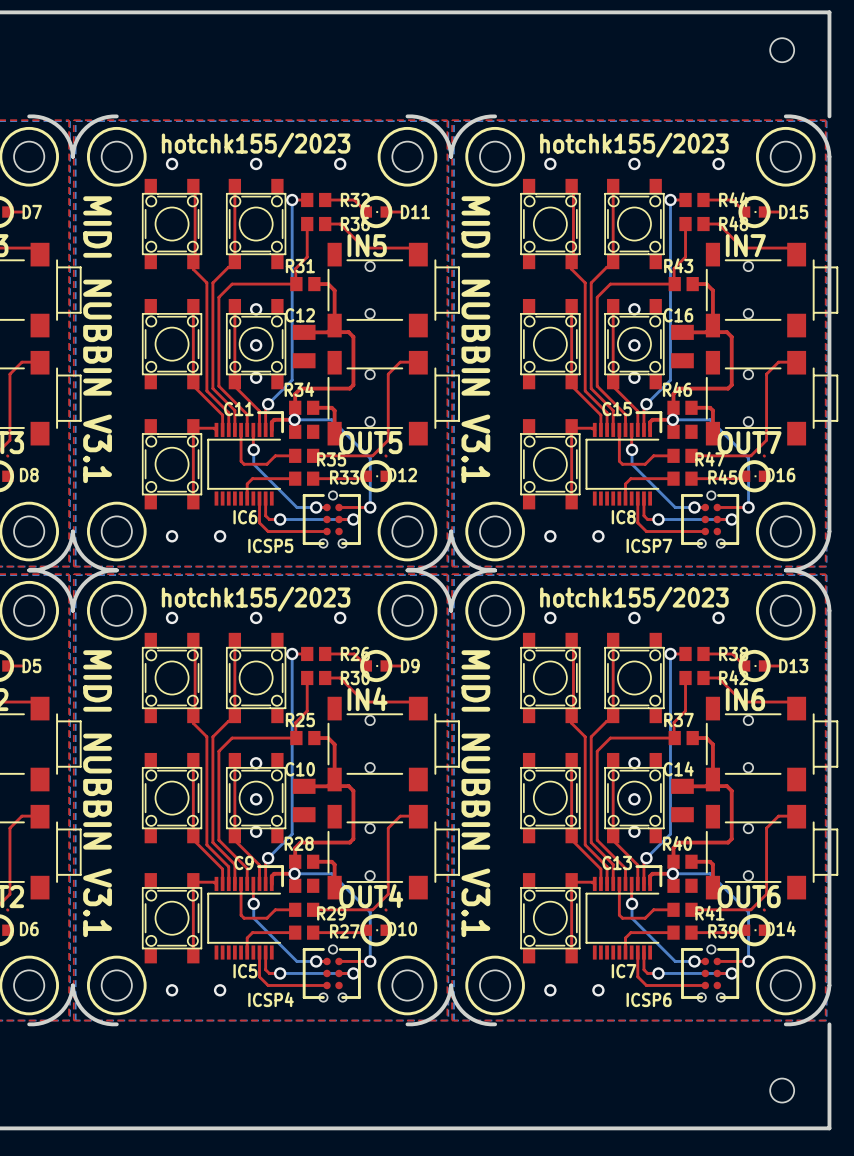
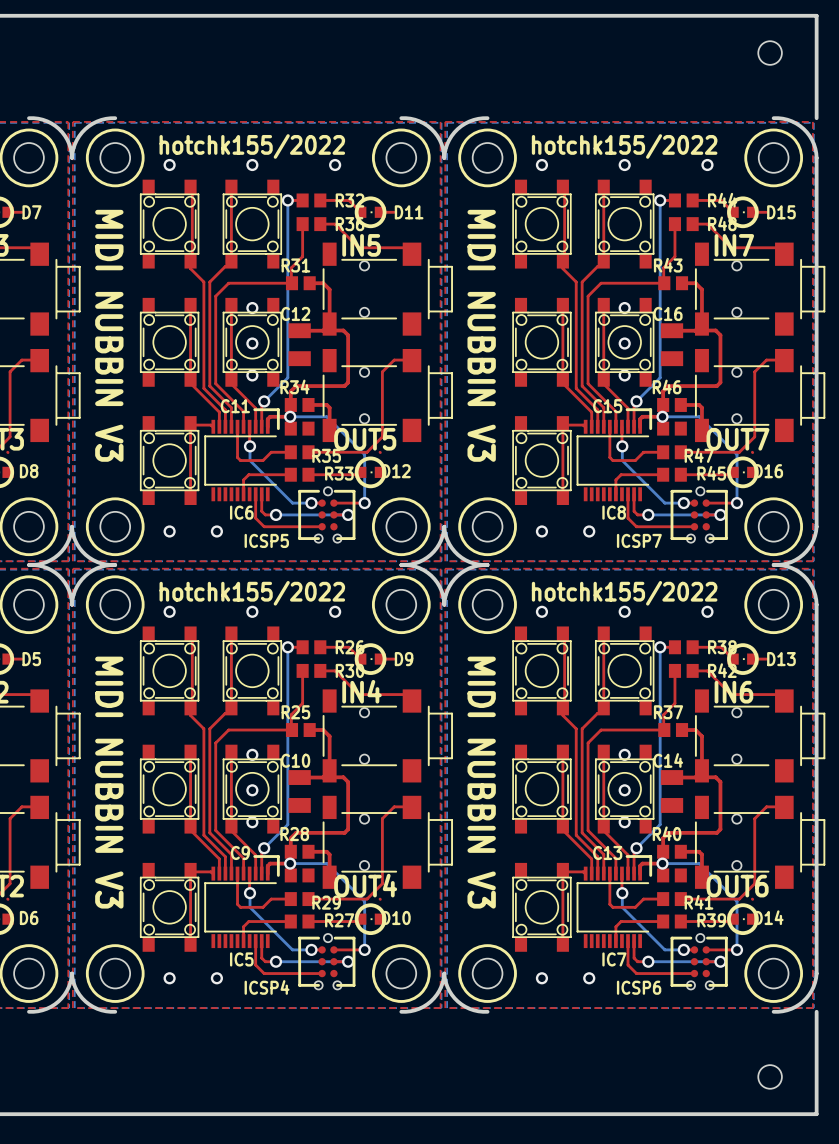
text: hotchk155/2023 (256, 145) -> hotchk155/2022 (252, 146)
text: hotchk155/2023 (634, 145) -> hotchk155/2022 (624, 146)
text: MIDI NUBBIN V3.1 (97, 339) -> MIDI NUBBIN V3 (109, 335)
text: MIDI NUBBIN V3.1 (475, 339) -> MIDI NUBBIN V3 (481, 335)
text: hotchk155/2023 (256, 599) -> hotchk155/2022 (252, 593)
text: hotchk155/2023 (634, 599) -> hotchk155/2022 (624, 593)
text: MIDI NUBBIN V3.1 (97, 793) -> MIDI NUBBIN V3 (109, 782)
text: MIDI NUBBIN V3.1 (475, 793) -> MIDI NUBBIN V3 (481, 782)

